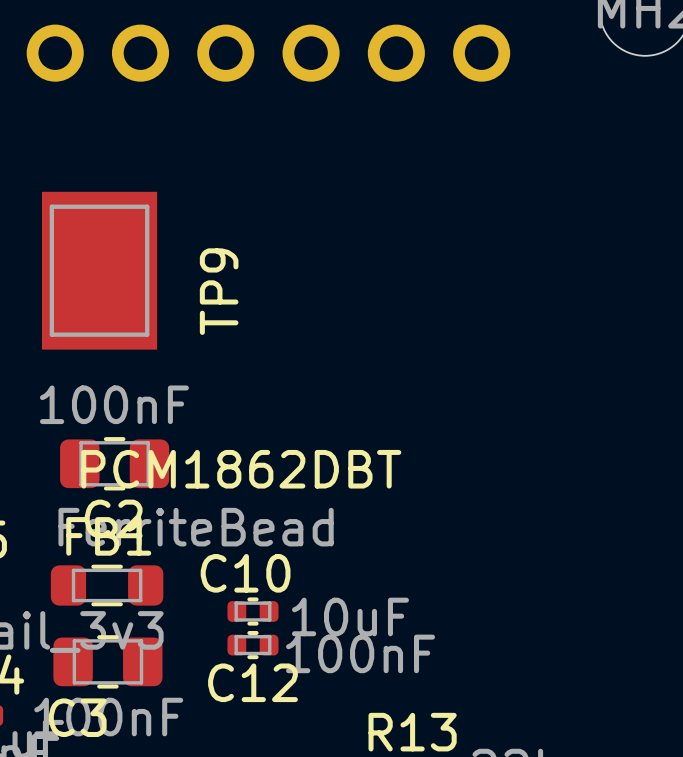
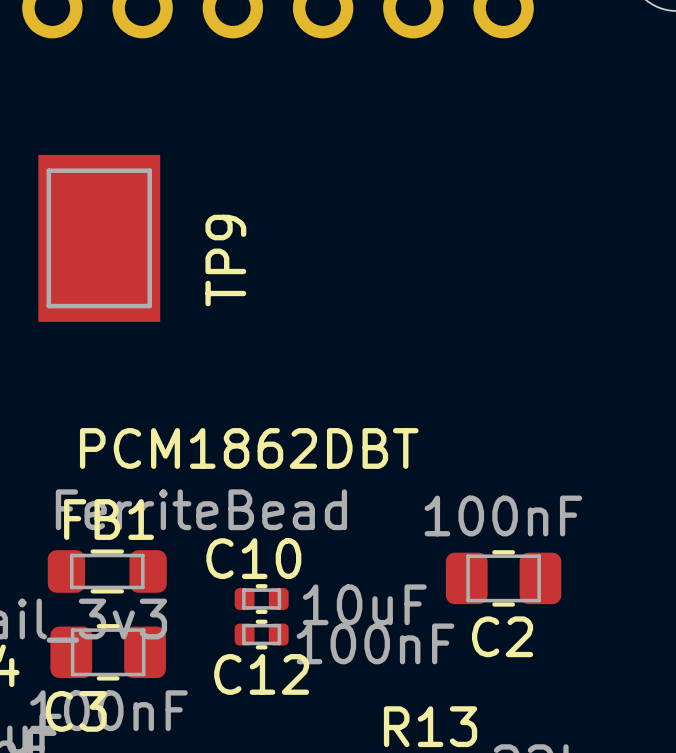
C2 position: (114, 463) -> (503, 578)

